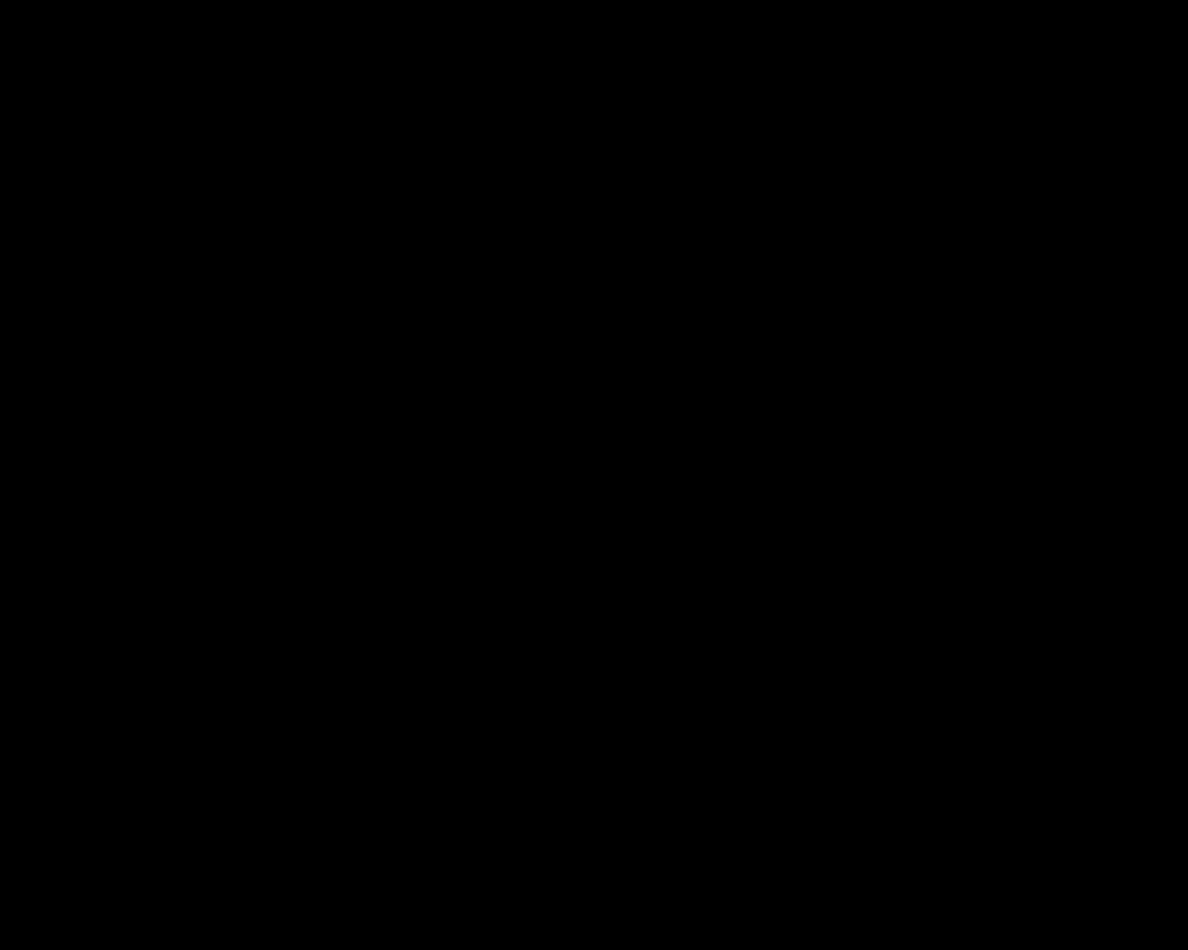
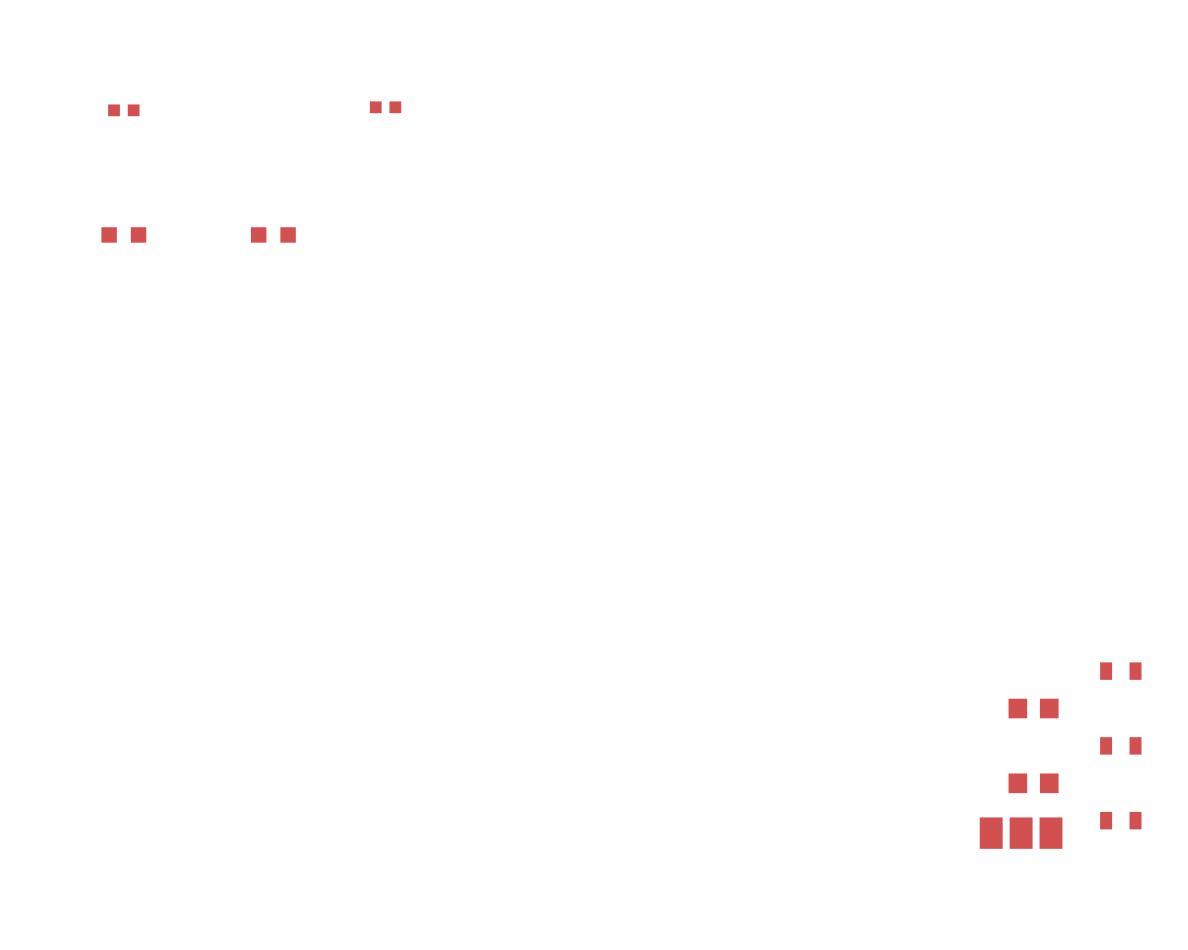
part: none -> (385, 107)
part: none -> (123, 110)
part: none -> (123, 234)
part: none -> (273, 234)
part: none -> (1120, 671)
part: none -> (1033, 708)
part: none -> (1120, 745)
part: none -> (1033, 783)
part: none -> (1120, 820)
part: none -> (1021, 833)

